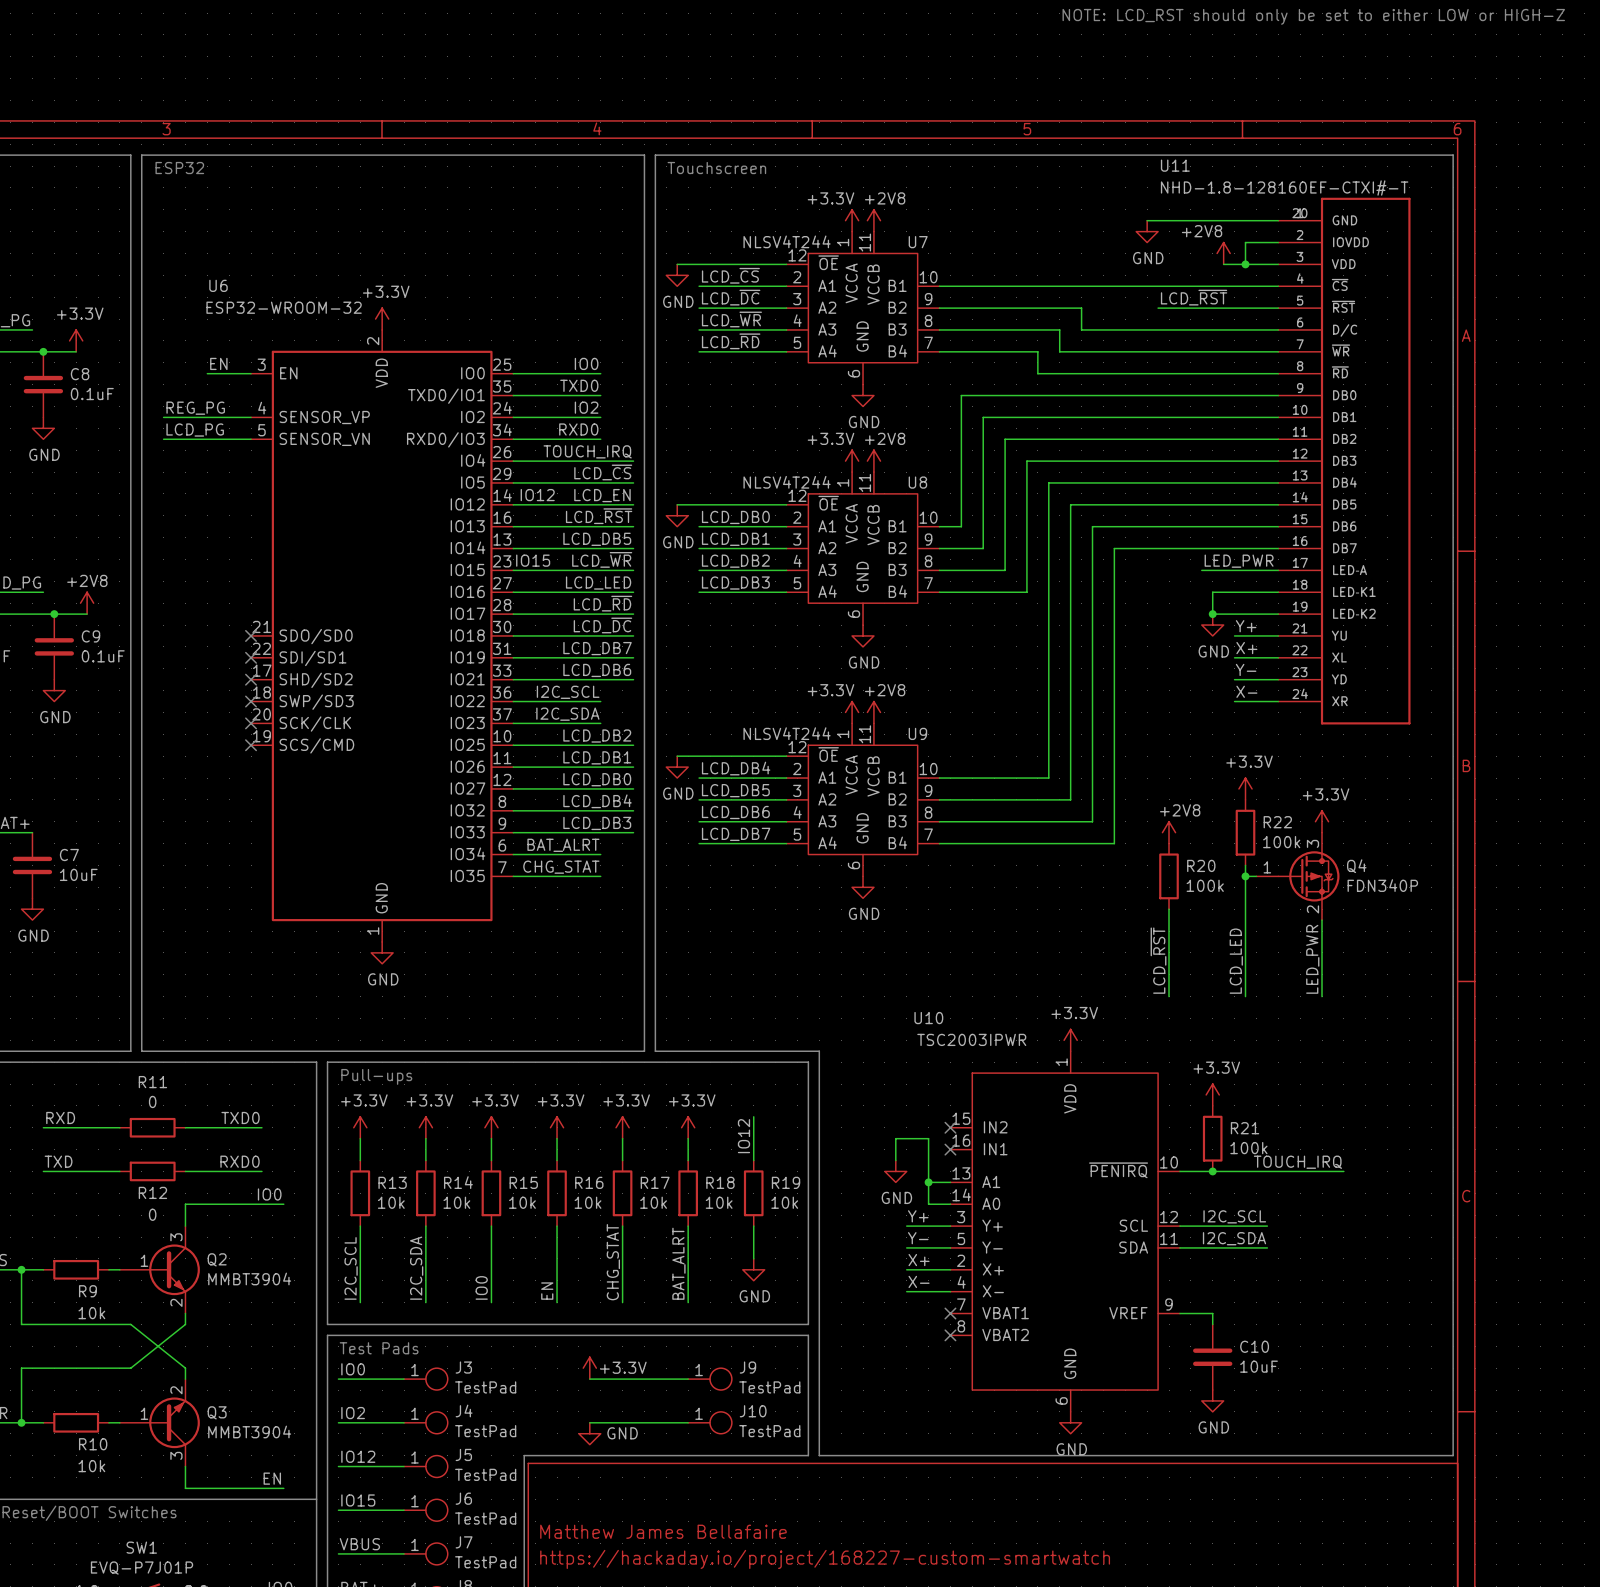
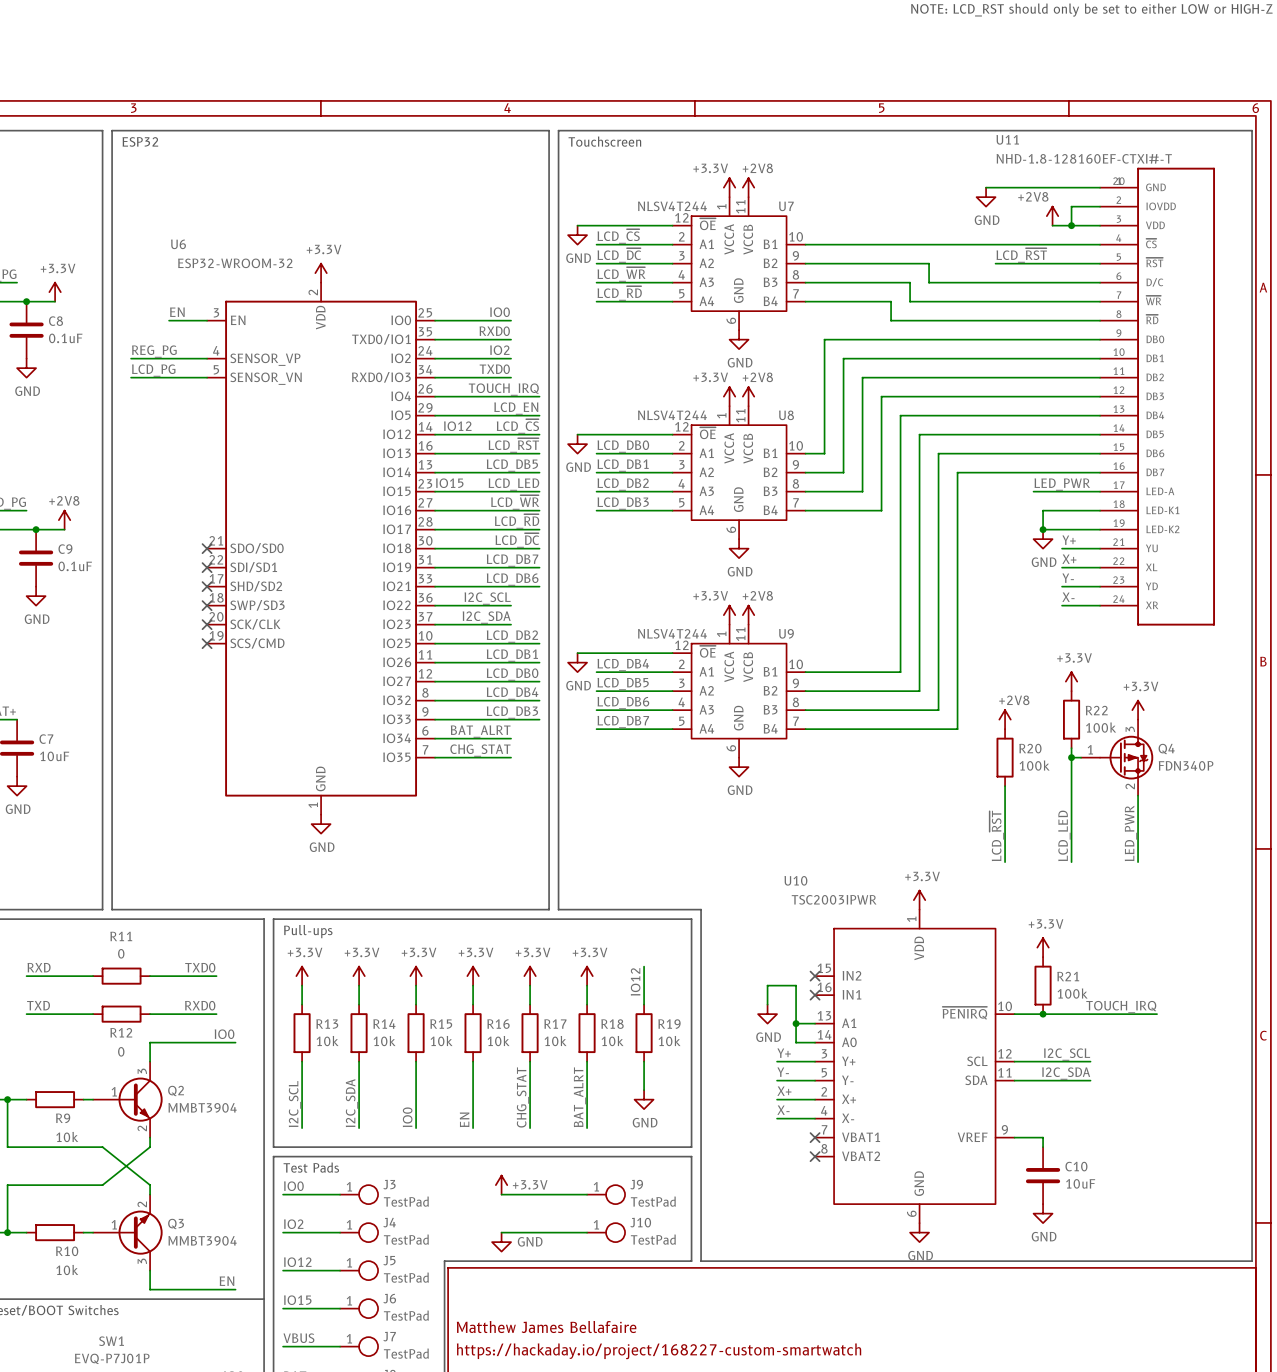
label: TXD0 (579, 385) -> RXD0 (494, 331)
label: RXD0 (578, 429) -> TXD0 (494, 369)
label: LCD_~{CS} (603, 472) -> LCD_EN (516, 408)
label: LCD_EN (602, 495) -> LCD_~{CS} (517, 426)
label: LCD_~{WR} (602, 559) -> LCD_LED (513, 484)
label: LCD_LED (598, 583) -> LCD_~{WR} (515, 502)

